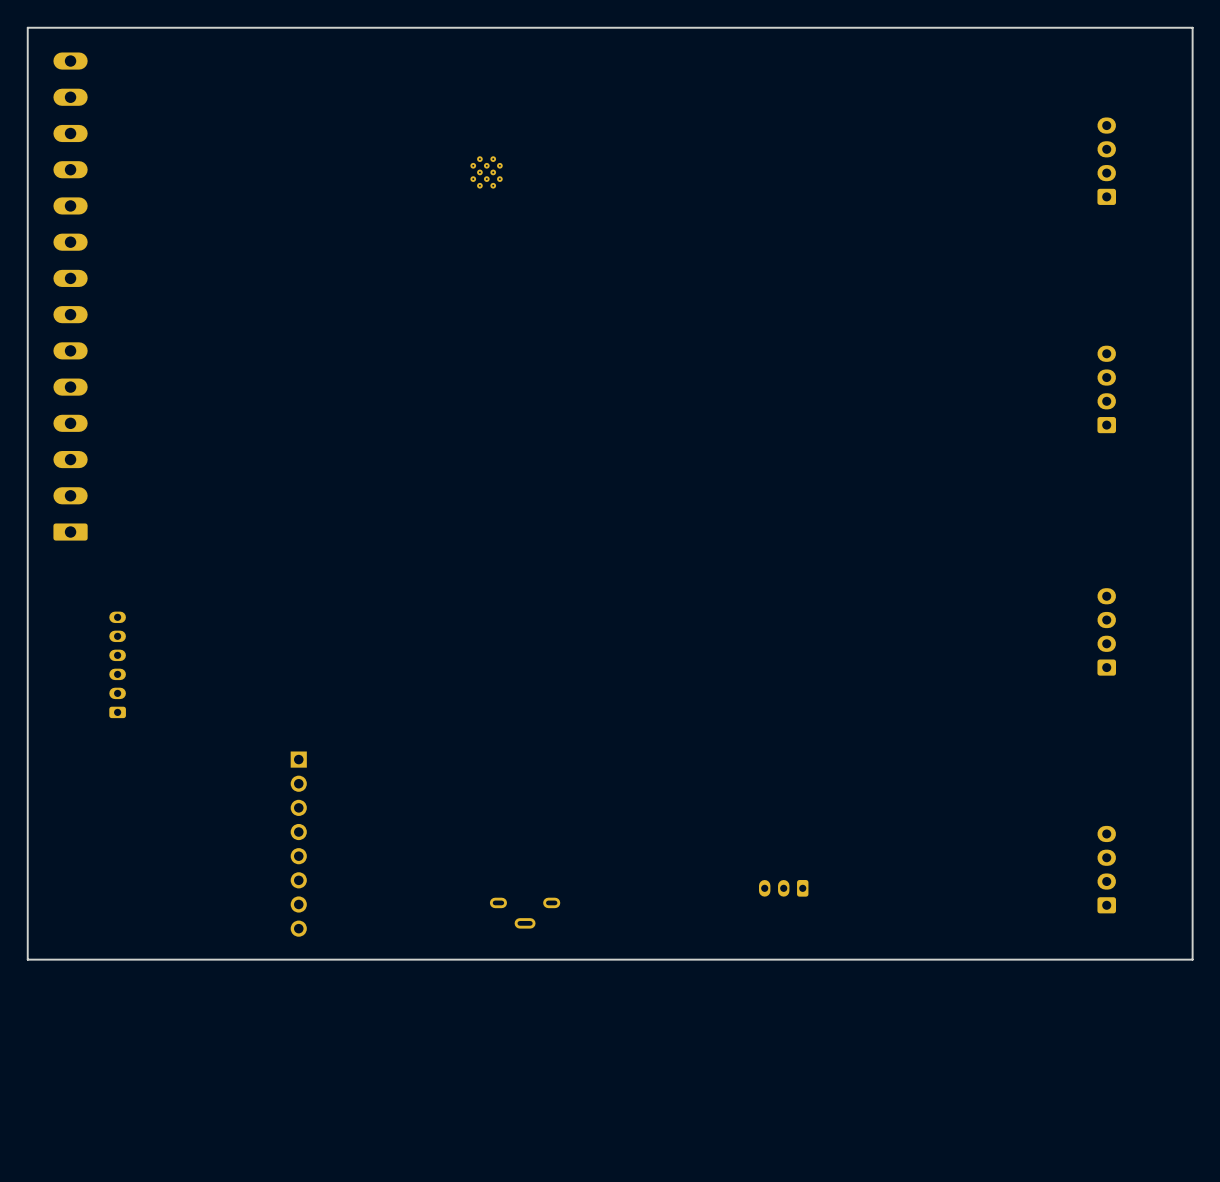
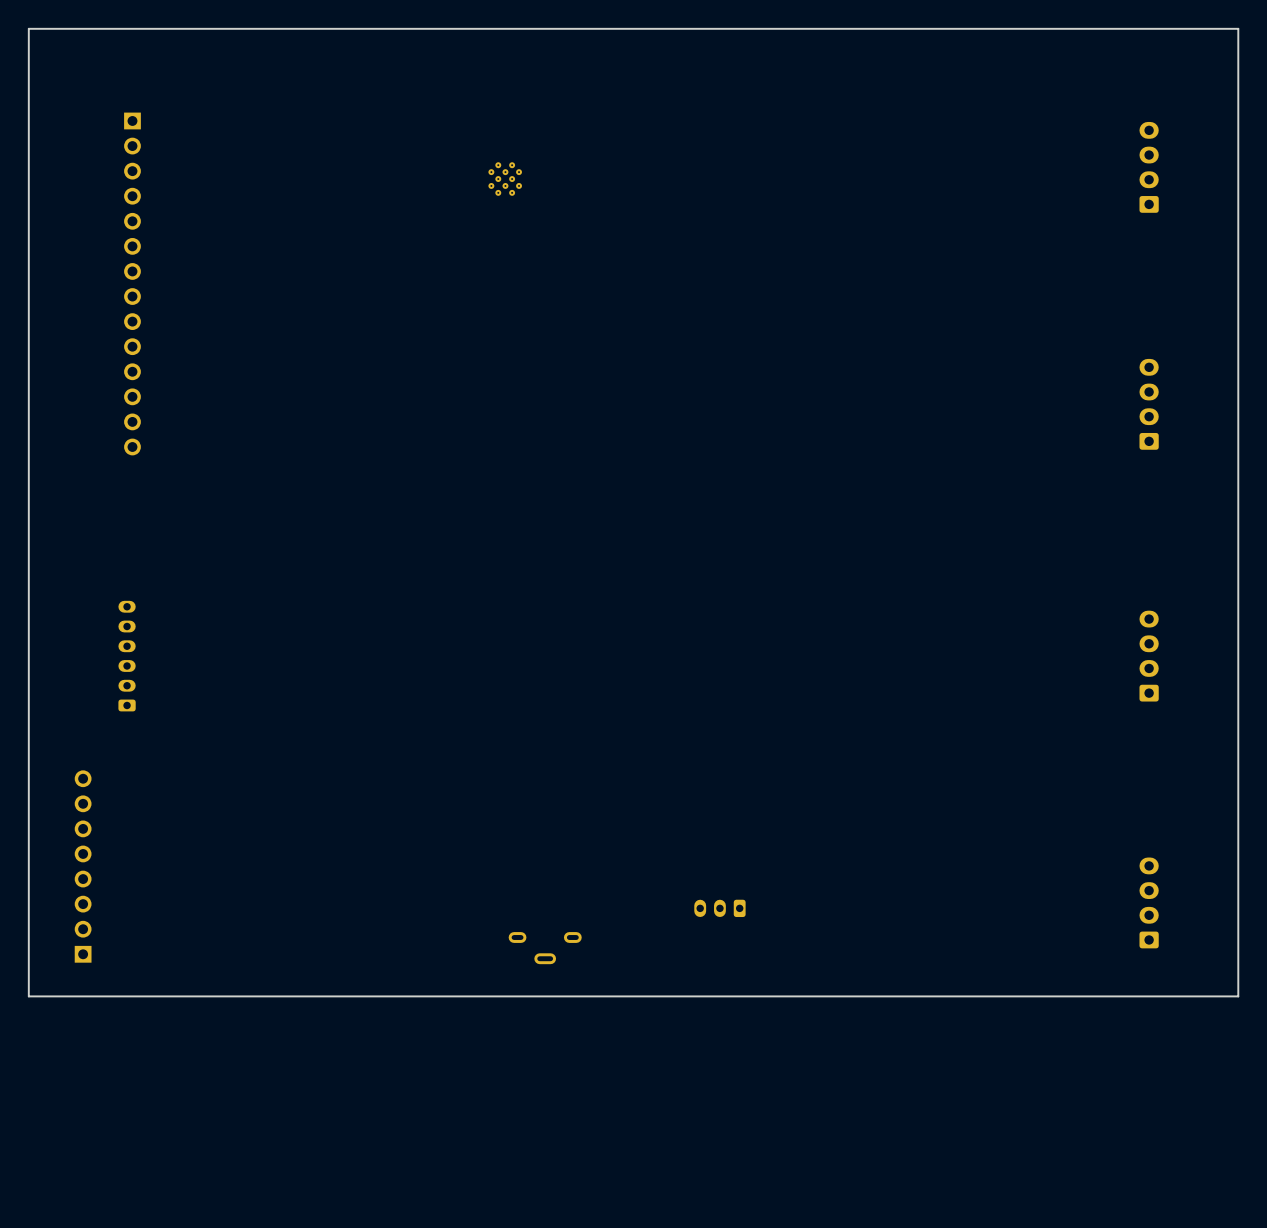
part: none -> (132, 283)
part: (70, 296) -> none
part position: (117, 664) -> (127, 656)
part rotation: 0° (298, 844) -> 180° (83, 866)
part position: (298, 844) -> (83, 866)
part position: (783, 888) -> (719, 908)

